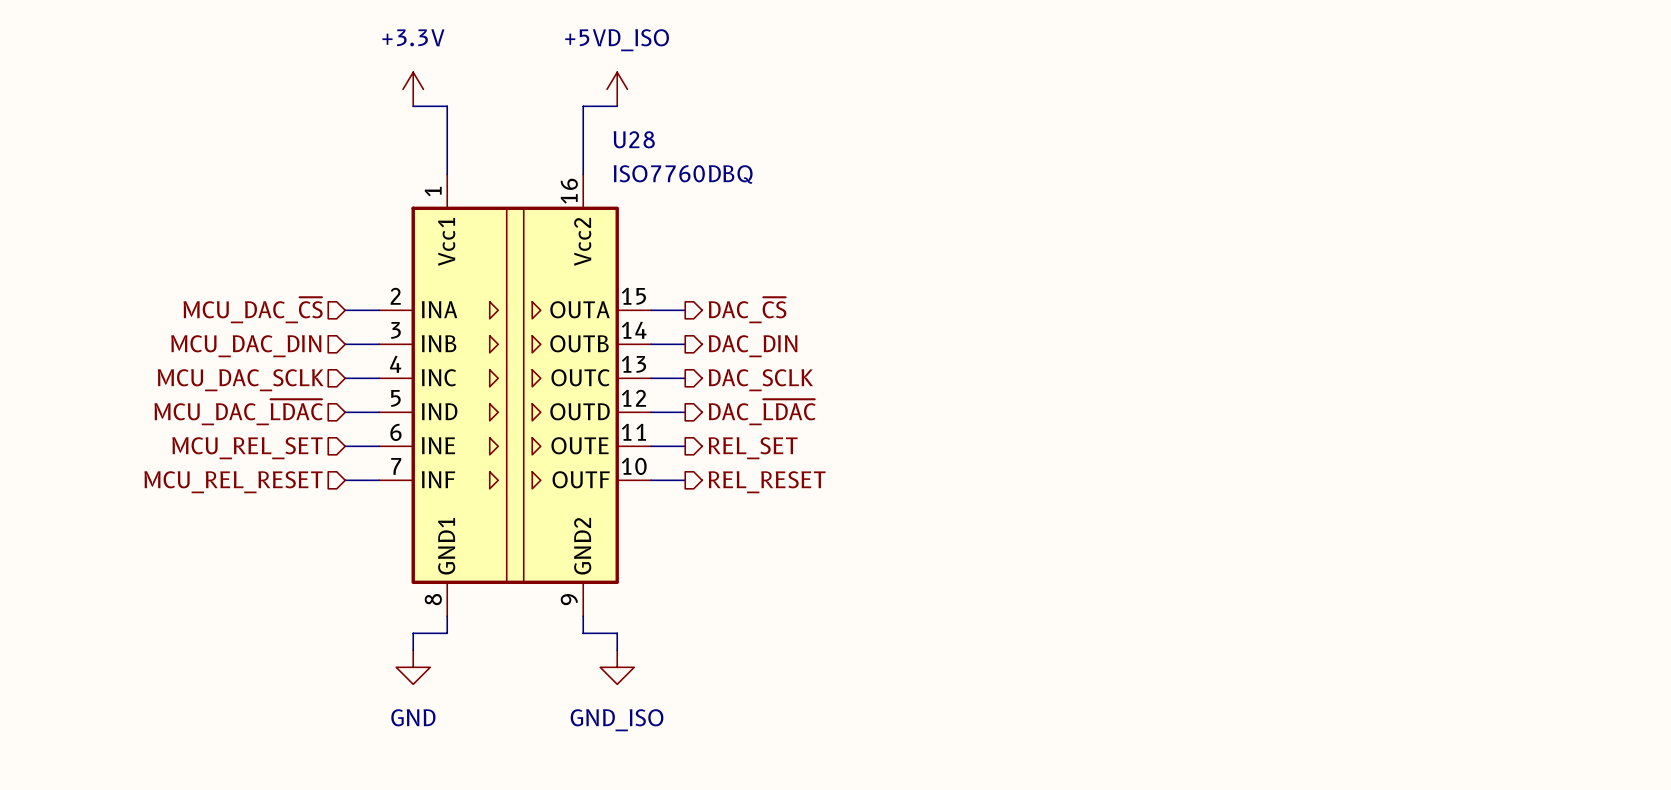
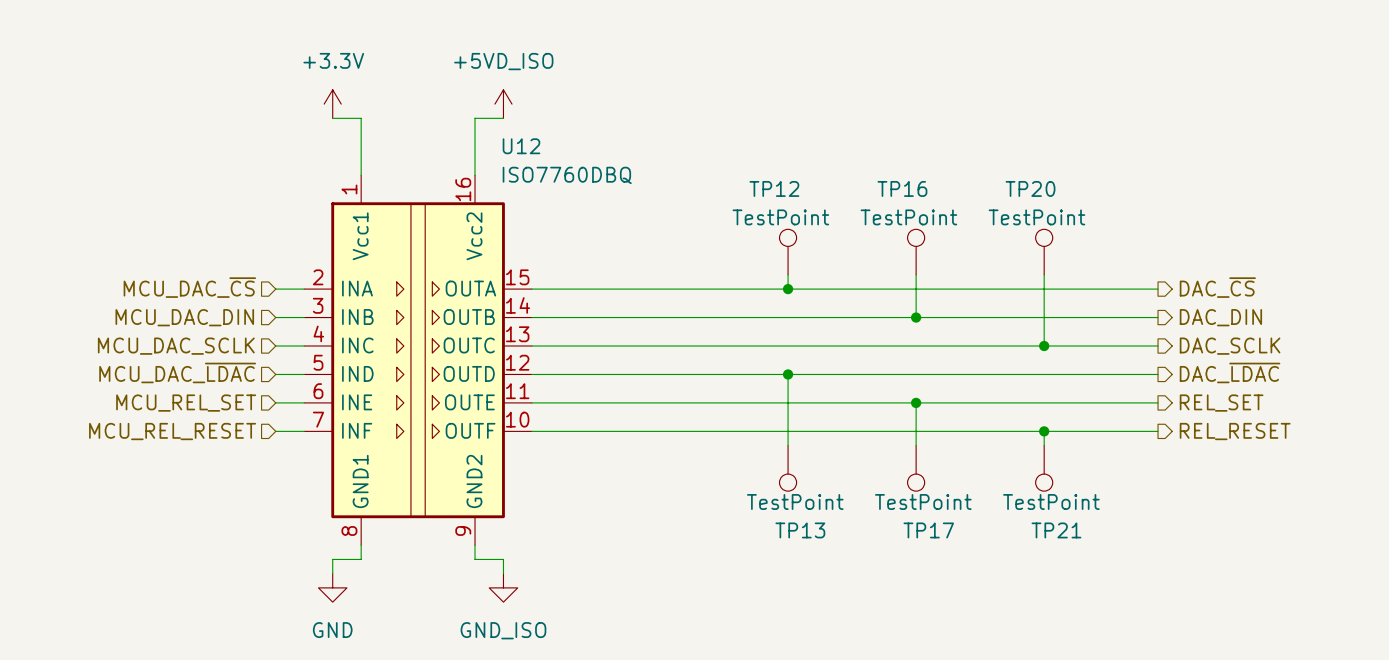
U28 name: U28 (634, 139) -> U12 (521, 146)
TP12: none -> TestPoint (788, 252)
TP16: none -> TestPoint (916, 252)
TP20: none -> TestPoint (1044, 252)
wire: none -> (788, 274) (788, 289)
wire: none -> (916, 274) (916, 317)
wire: none -> (1044, 274) (1044, 346)
wire: none -> (560, 289) (1158, 289)
hierarchical label: DAC_~{CS} (747, 310) -> none
junction: none -> (788, 289)
hierarchical label: none -> DAC_~{CS} (1217, 287)
wire: none -> (560, 317) (1158, 317)
junction: none -> (916, 317)
hierarchical label: DAC_DIN (753, 346) -> none
hierarchical label: none -> DAC_DIN (1220, 317)
wire: none -> (560, 346) (1158, 346)
junction: none -> (1044, 346)
hierarchical label: DAC_SCLK (760, 380) -> none
hierarchical label: none -> DAC_SCLK (1230, 346)
wire: none -> (560, 374) (1158, 374)
hierarchical label: DAC_~{LDAC} (762, 412) -> none
wire: none -> (788, 374) (788, 445)
junction: none -> (788, 374)
hierarchical label: none -> DAC_~{LDAC} (1230, 372)
wire: none -> (560, 402) (1158, 402)
wire: none -> (916, 402) (916, 445)
junction: none -> (916, 402)
hierarchical label: REL_SET (753, 448) -> none
hierarchical label: none -> REL_SET (1221, 403)
wire: none -> (560, 431) (1158, 431)
wire: none -> (1044, 431) (1044, 445)
junction: none -> (1044, 431)
hierarchical label: REL_RESET (767, 482) -> none
hierarchical label: none -> REL_RESET (1235, 431)
TP13: none -> TestPoint (788, 468)
TP17: none -> TestPoint (916, 468)
TP21: none -> TestPoint (1044, 468)

